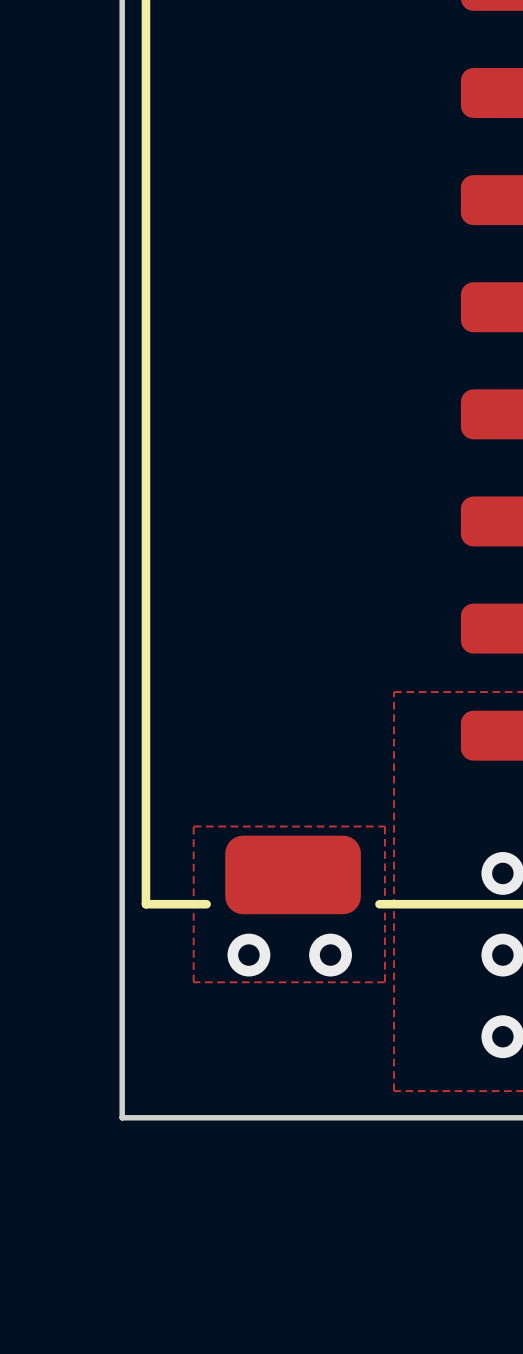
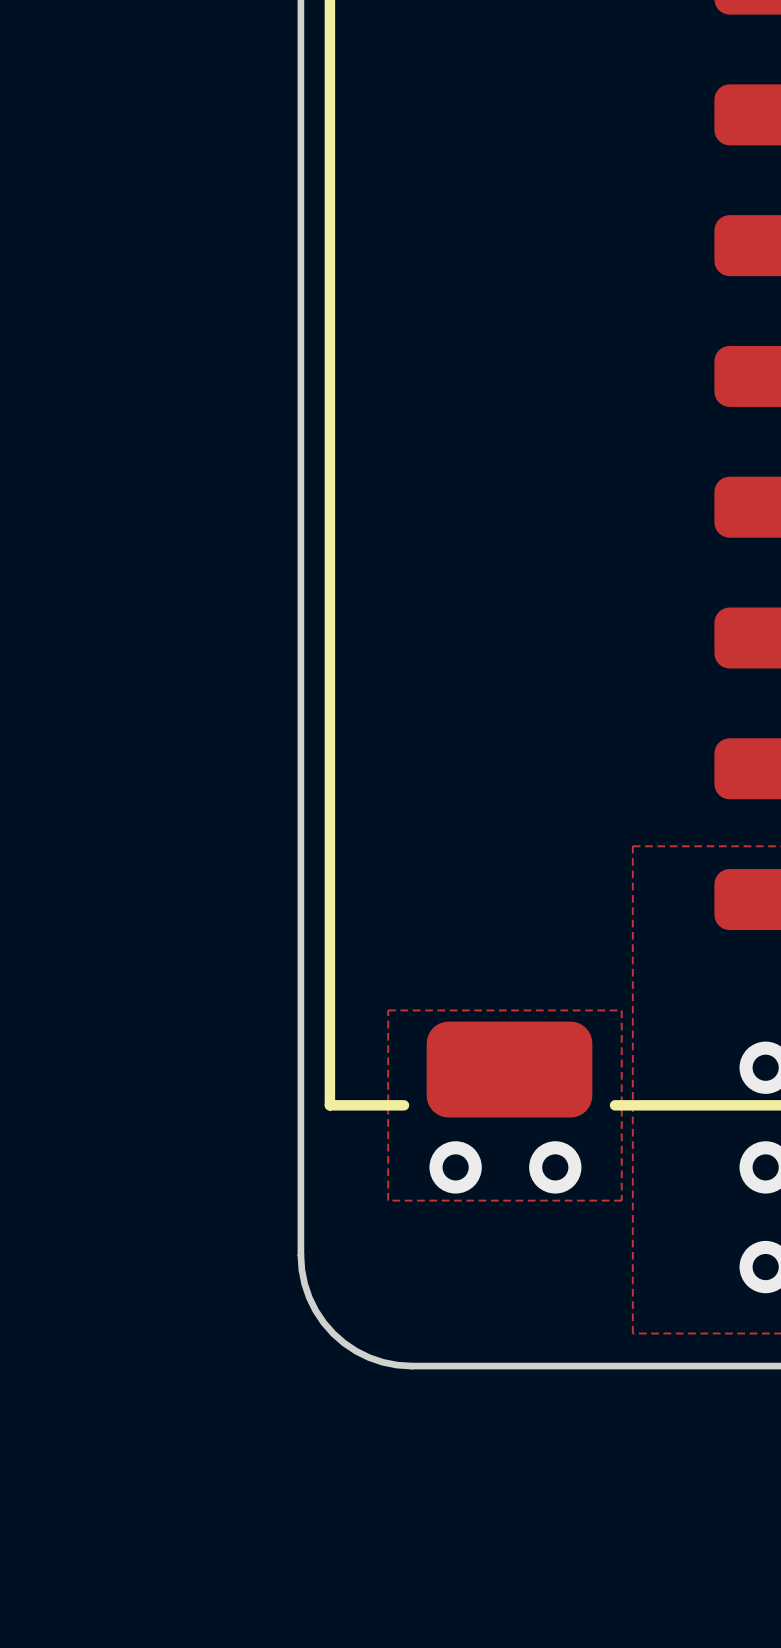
board edge: (122, 1027) (122, 1117) (212, 1117) -> (300, 1255) (304, 1284) (309, 1297) (315, 1310) (333, 1333) (356, 1351) (369, 1357) (397, 1365) (411, 1366)

